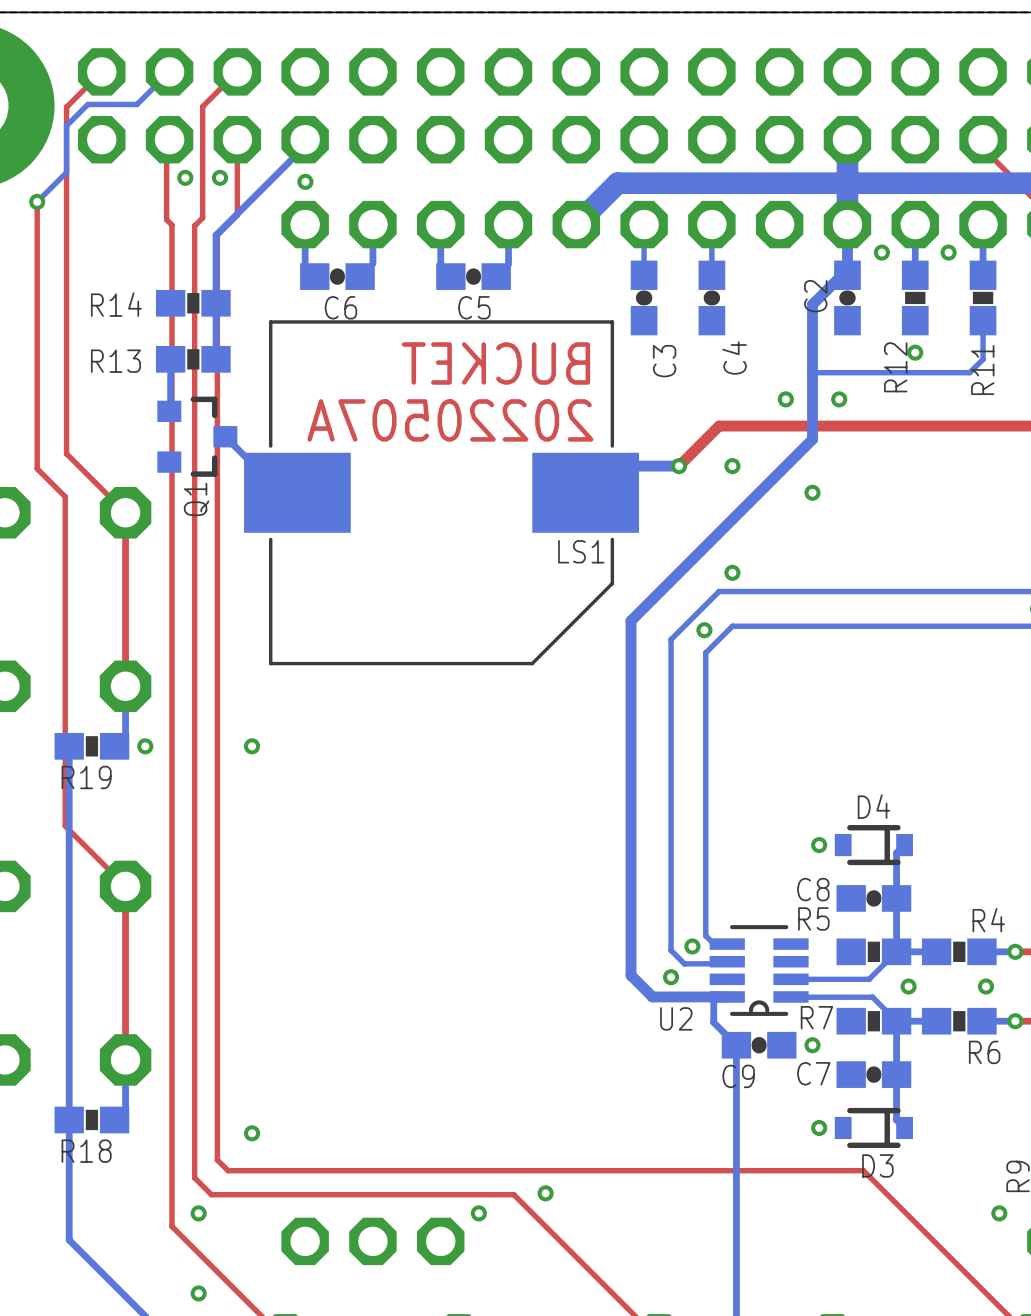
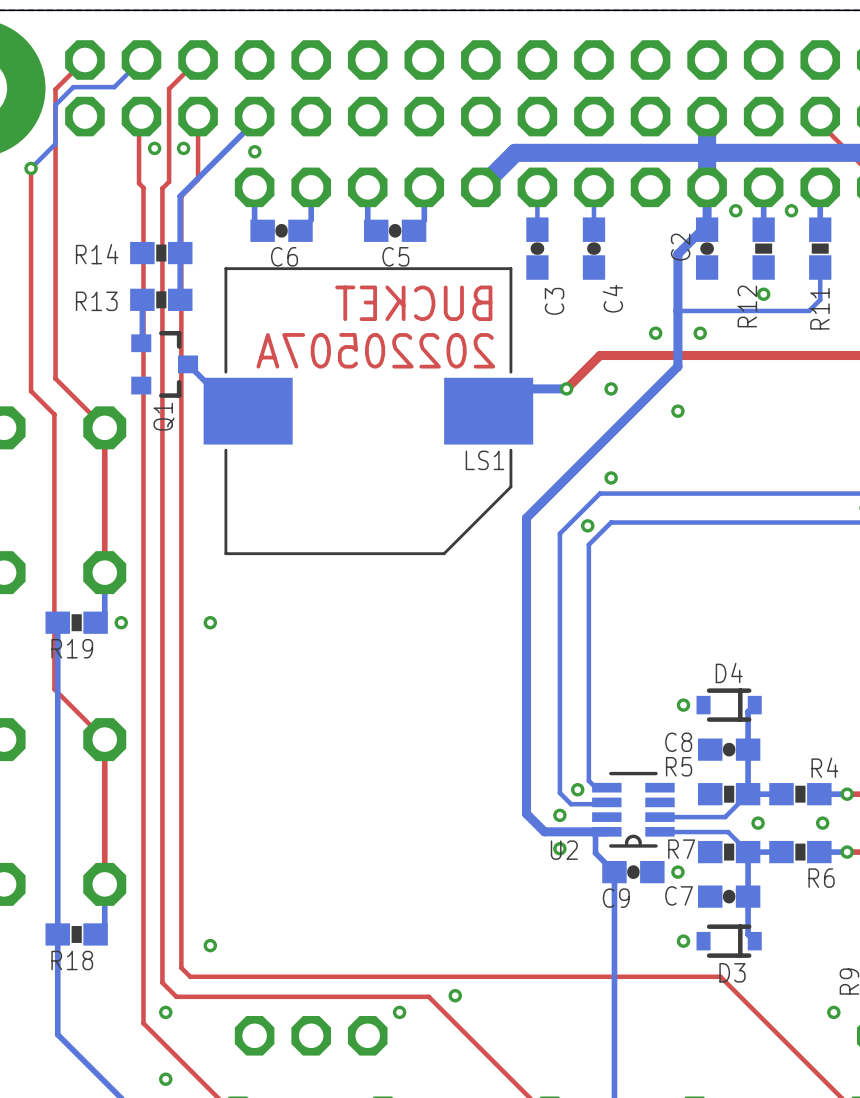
via: none -> (559, 848)

